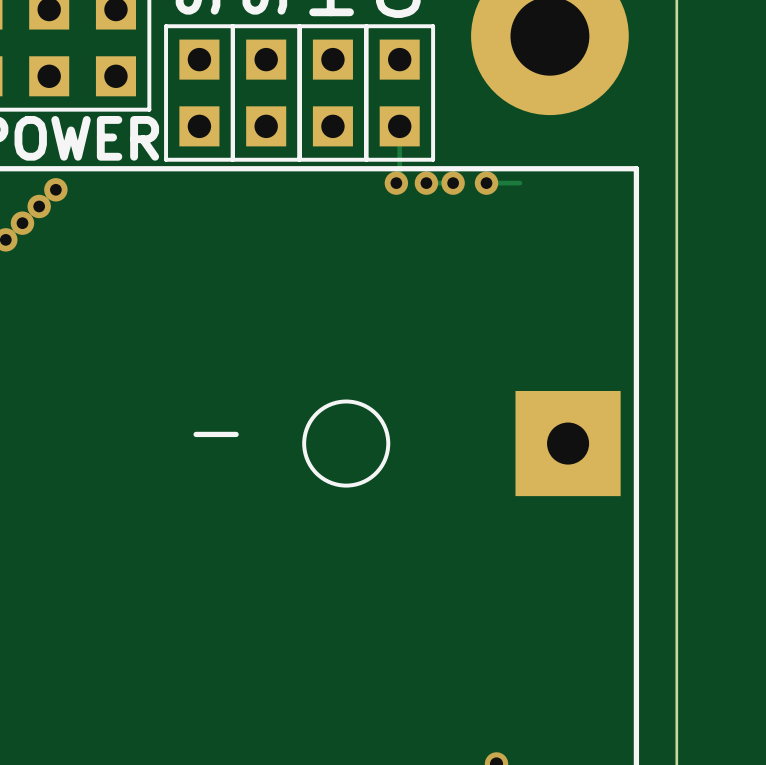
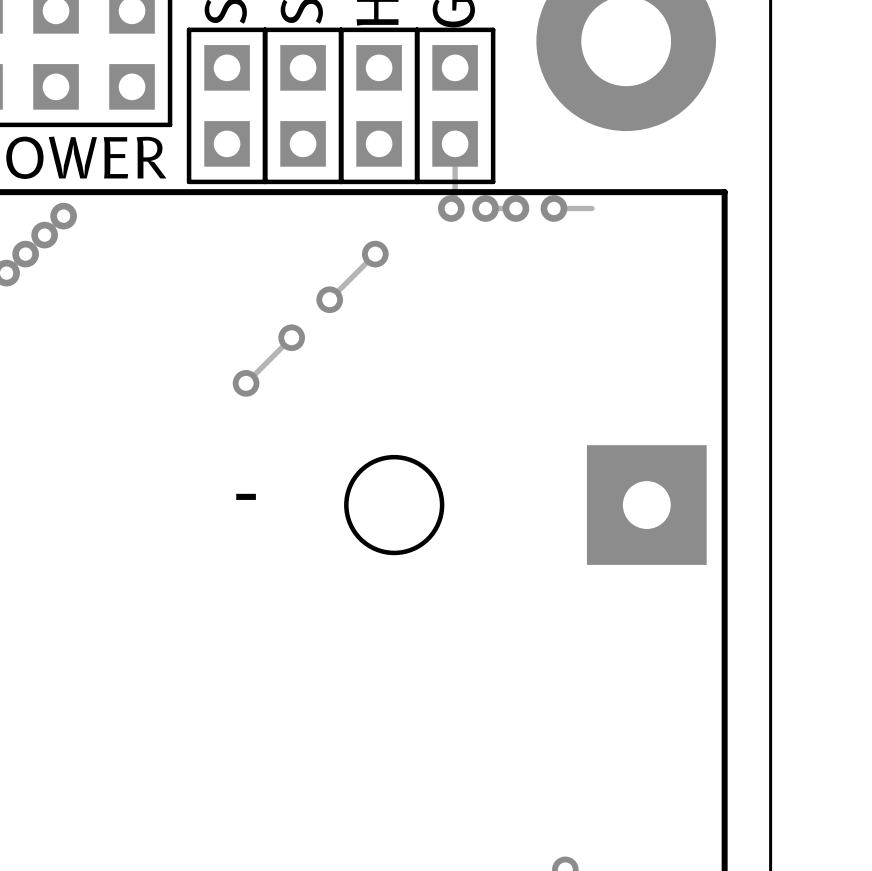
track: none -> (375, 254) (329, 299)
via: none -> (375, 254)
via: none -> (329, 299)
track: none -> (291, 337) (246, 383)
via: none -> (291, 337)
via: none -> (246, 383)

